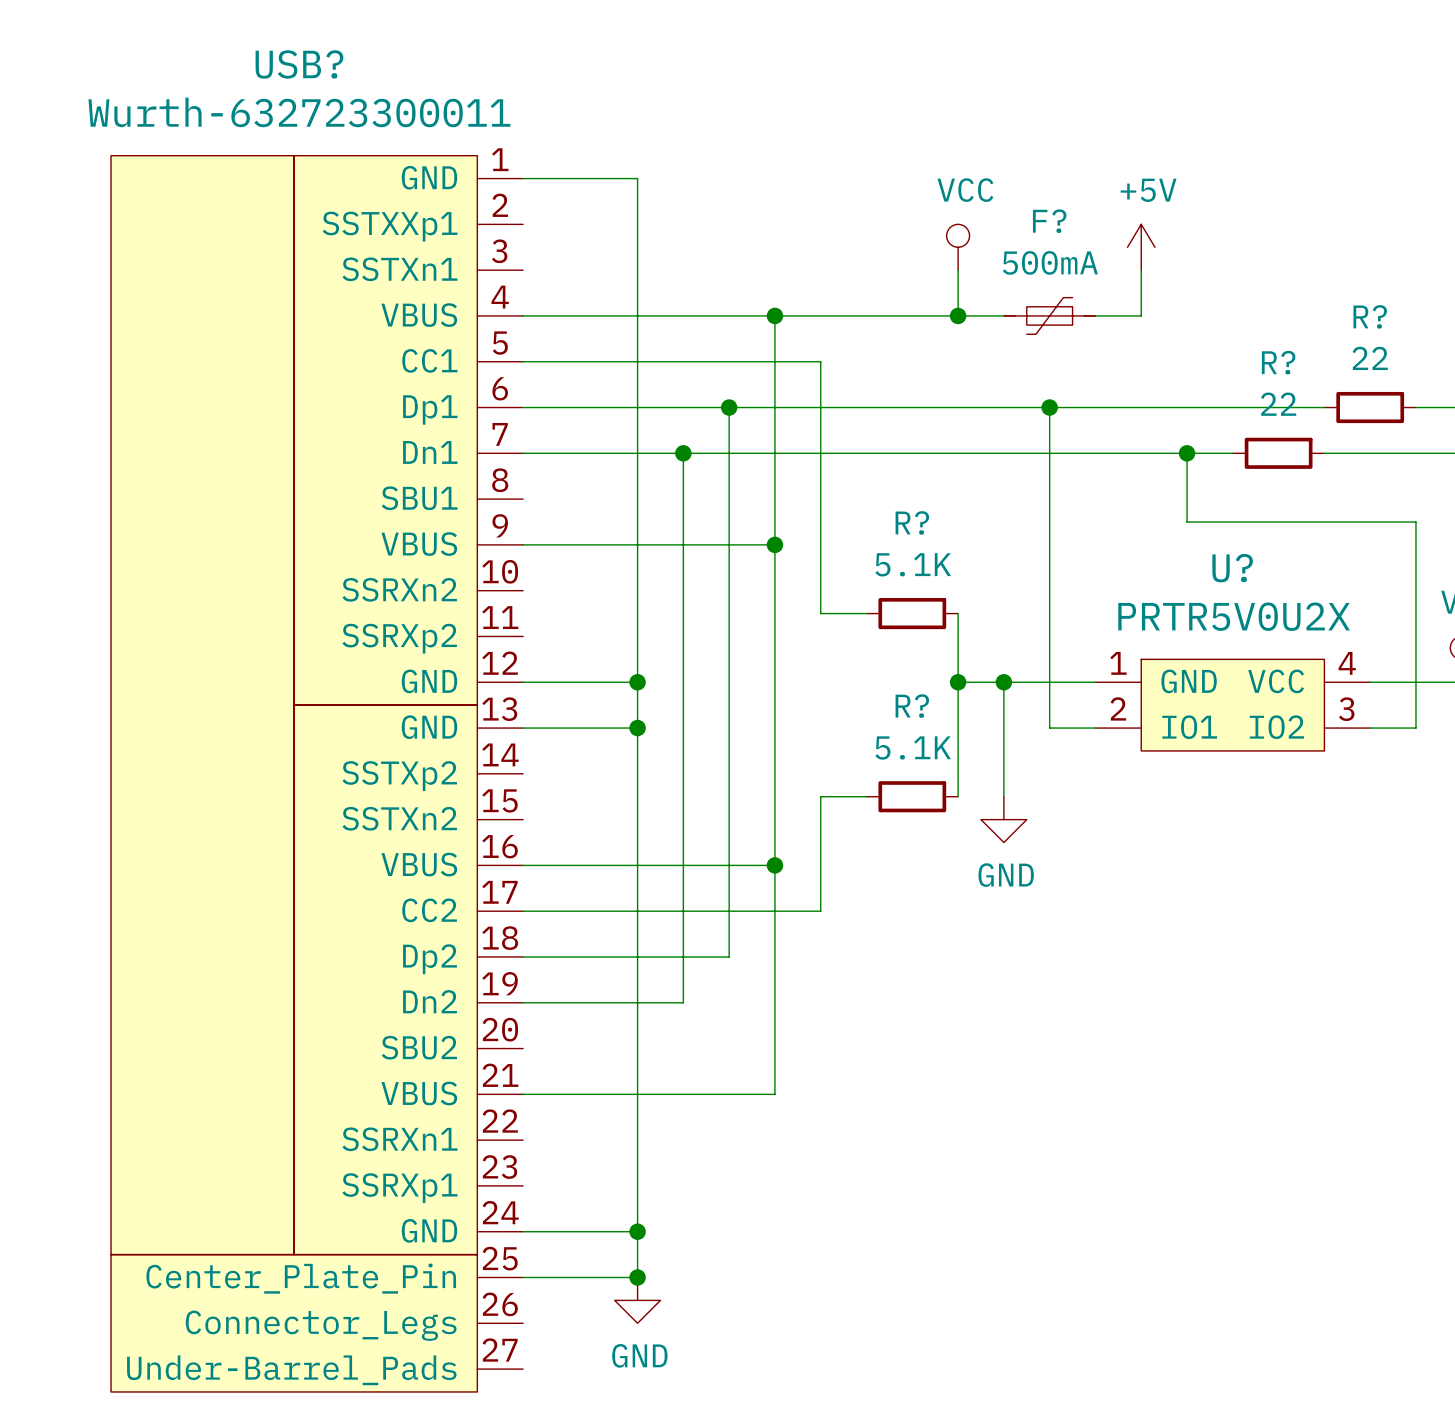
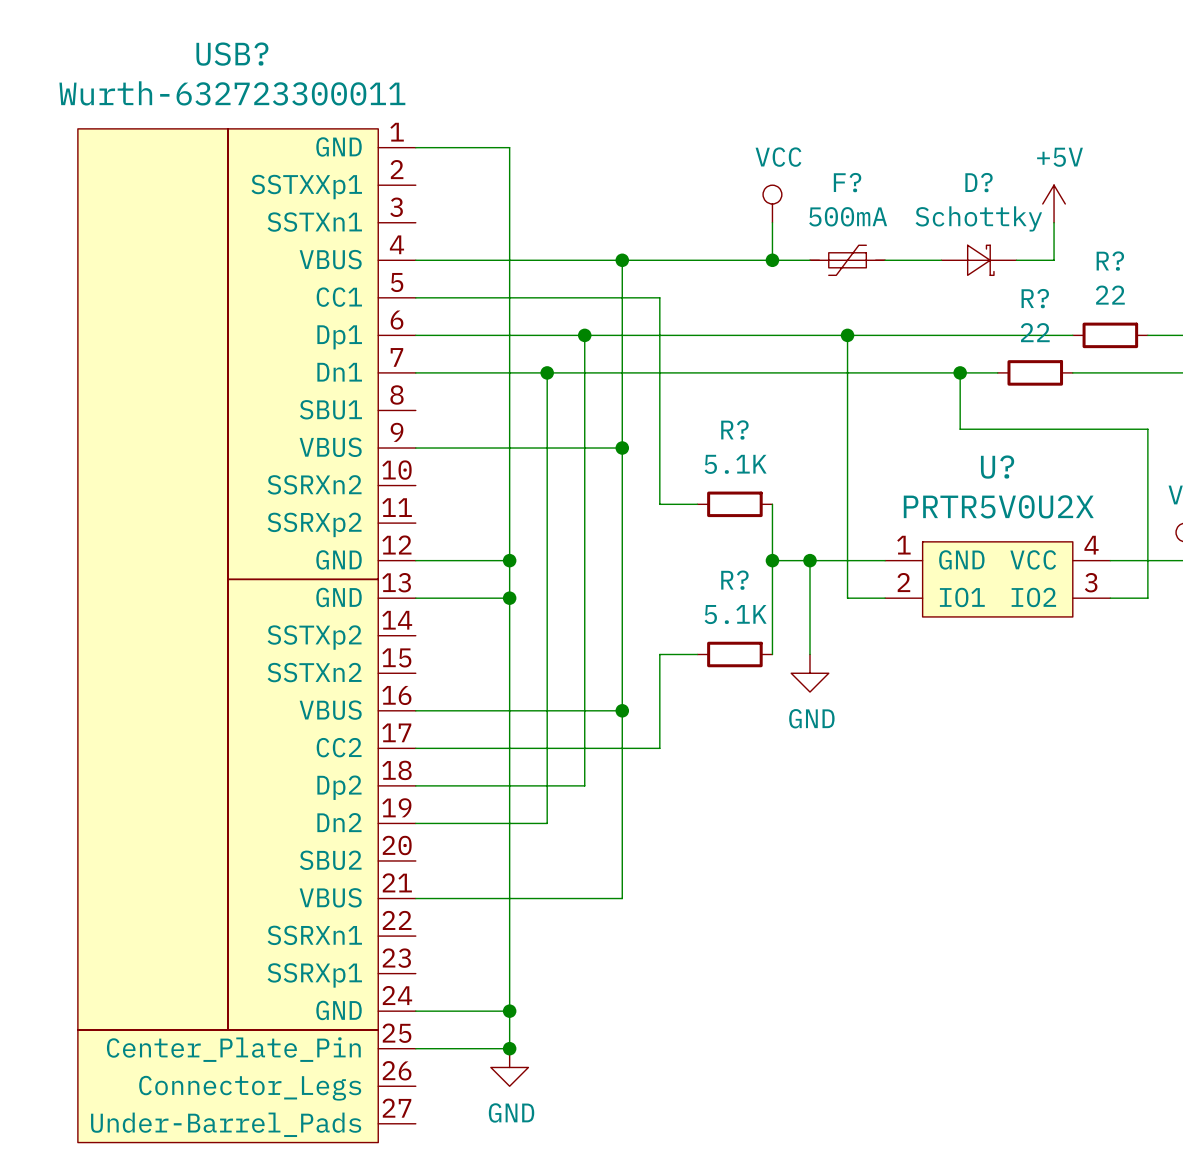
power symbol position: +5V (1141, 247) -> +5V (1054, 203)
wire: (1141, 270) (1141, 315) -> (941, 260) (922, 260)
wire: none -> (1054, 222) (1054, 260) (1016, 260)
D?: none -> Schottky (978, 260)

